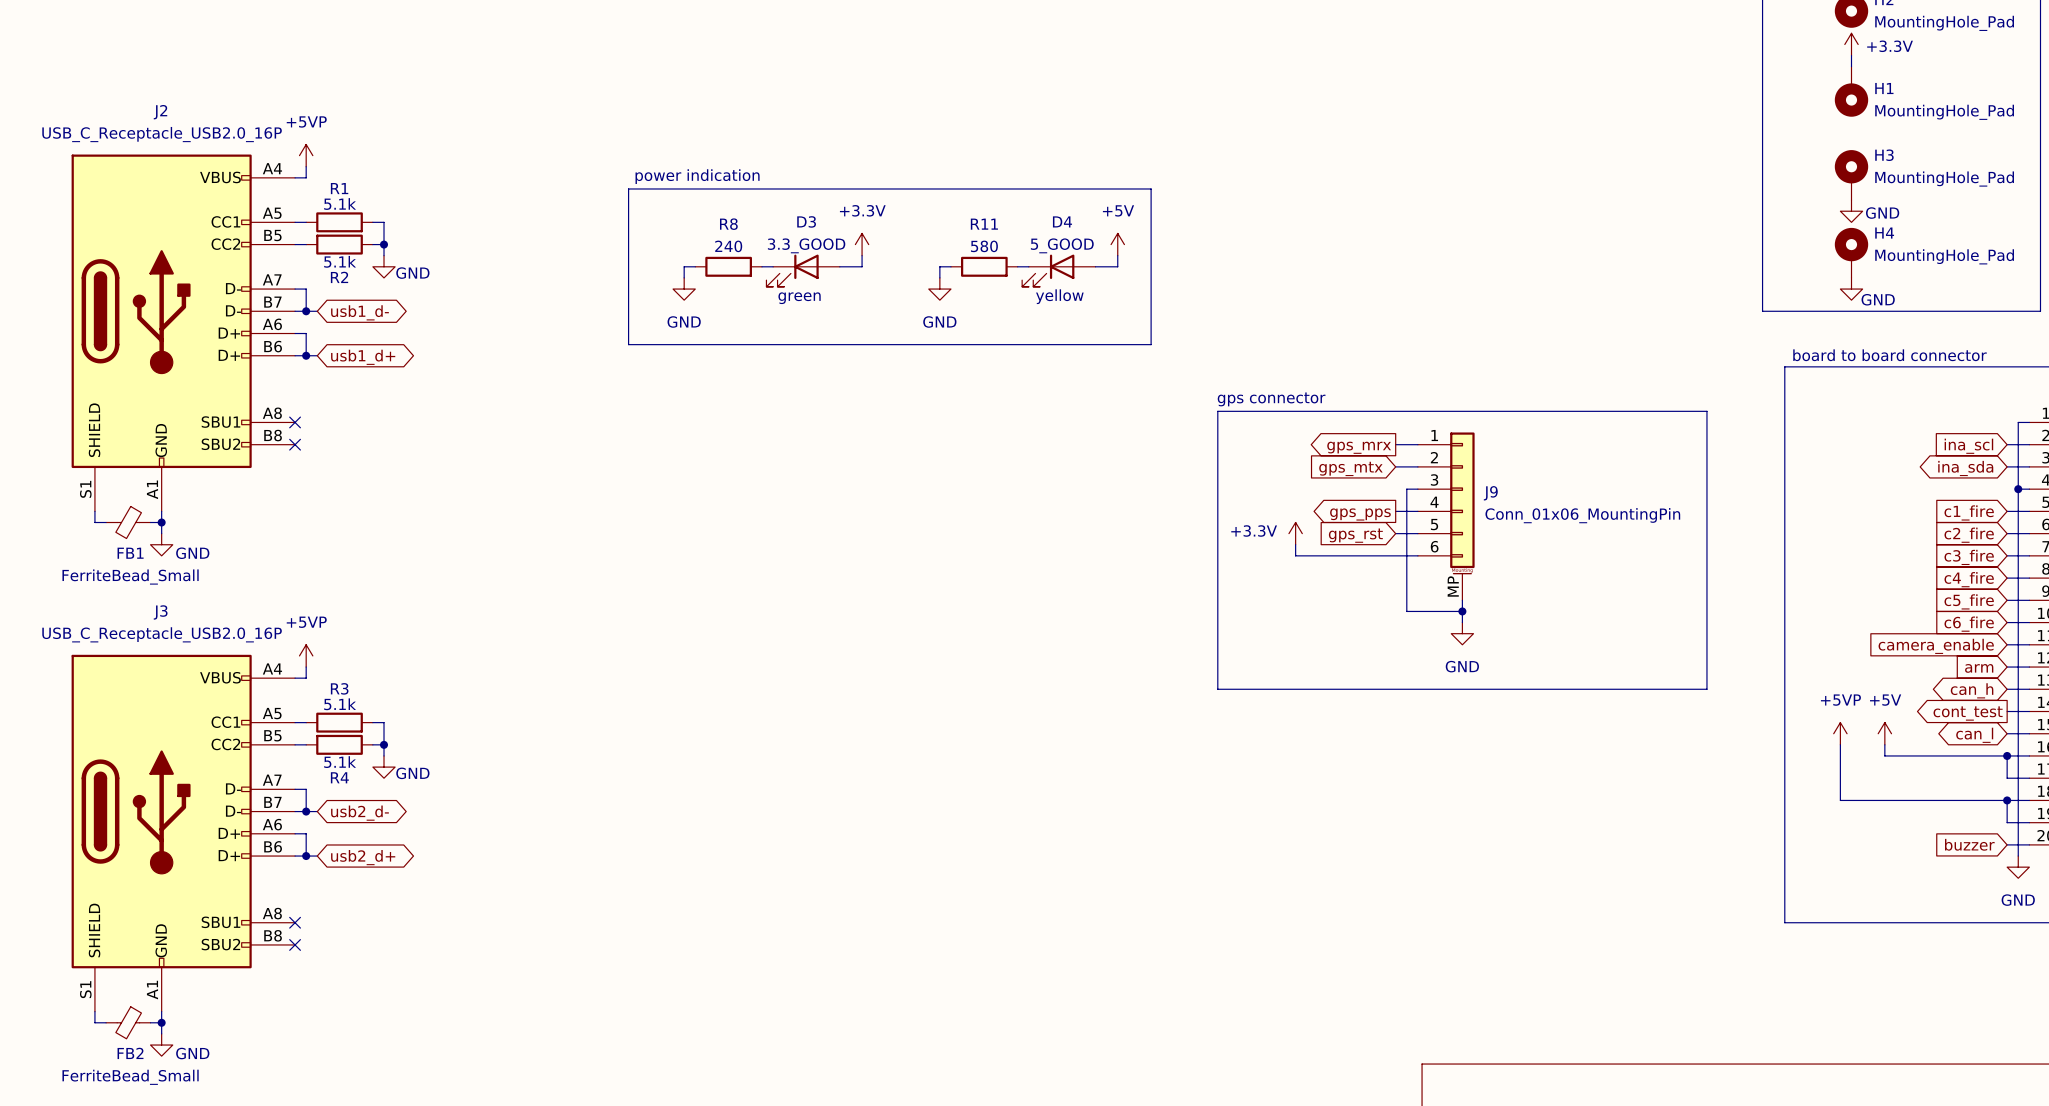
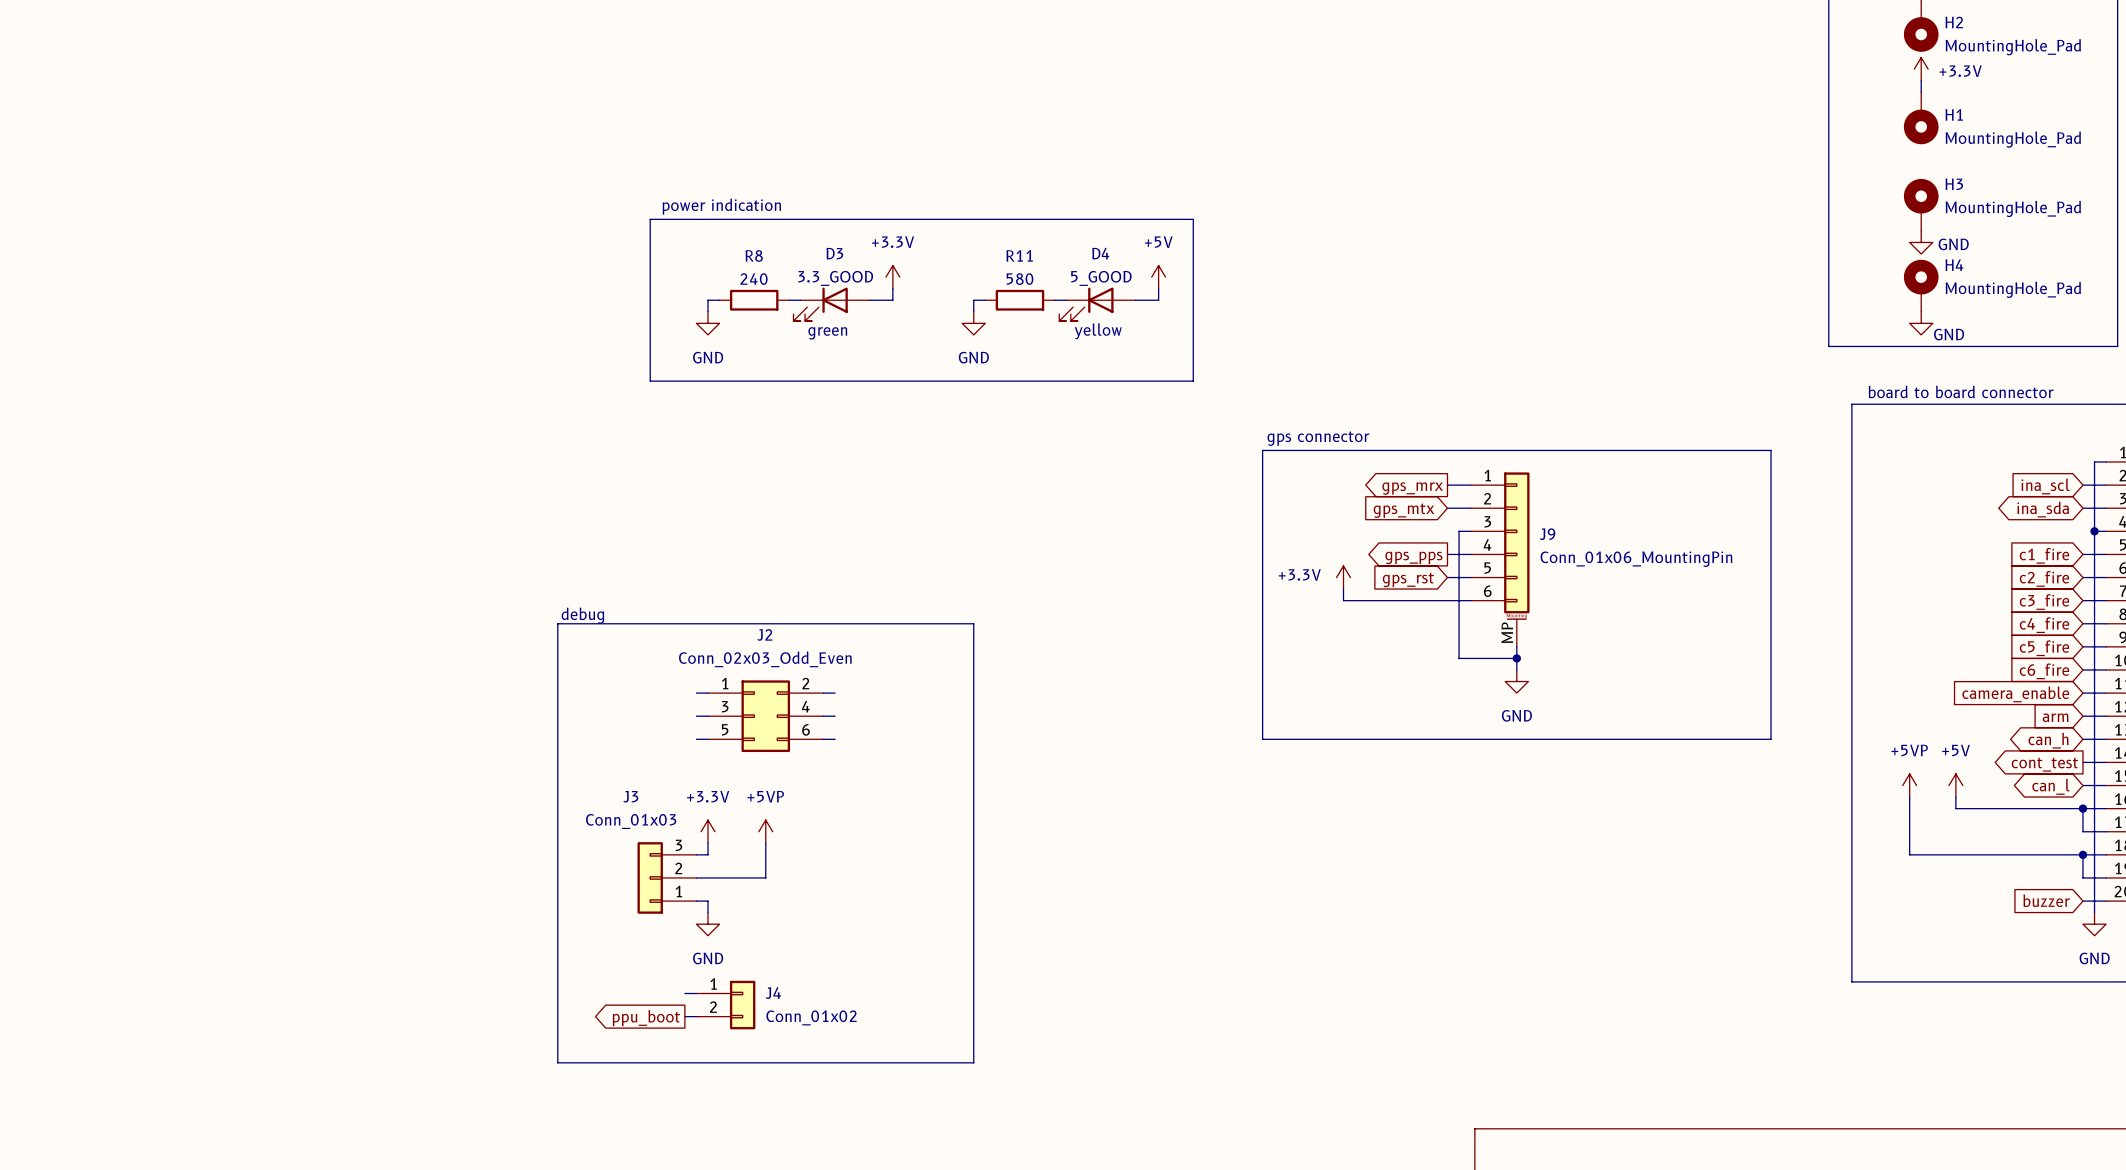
J2 name position: J2 (160, 112) -> J2 (764, 634)
J2 value: USB_C_Receptacle_USB2.0_16P (162, 134) -> Conn_02x03_Odd_Even (765, 659)
J2 symbol: [71, 154, 296, 512] -> [708, 680, 824, 753]
power symbol: +5VP (306, 155) -> none
wire: (306, 166) (306, 177) (295, 177) -> none
wire: (295, 222) (306, 222) -> none
R1: 5.1k (339, 222) -> none
wire: (372, 222) (384, 222) (384, 255) -> none
wire: (295, 244) (306, 244) -> none
R2: 5.1k (339, 244) -> none
wire: (372, 244) (384, 244) -> none
junction: (384, 244) -> none
power symbol: GND (384, 266) -> none
wire: (295, 289) (306, 289) (306, 311) -> none
wire: (295, 311) (317, 311) -> none
junction: (306, 311) -> none
global label: usb1_d- (359, 312) -> none
wire: (295, 333) (306, 333) (306, 355) -> none
wire: (295, 355) (317, 355) -> none
junction: (306, 355) -> none
global label: usb1_d+ (363, 357) -> none
no-connect mark: (295, 422) -> none
no-connect mark: (295, 444) -> none
wire: (94, 511) (94, 522) (106, 522) -> none
wire: (161, 511) (161, 533) -> none
FB1: FerriteBead_Small (128, 522) -> none
wire: (150, 522) (161, 522) -> none
junction: (161, 522) -> none
power symbol: GND (161, 544) -> none
text: none -> debug (582, 615)
line: none -> (557, 623) (973, 623) (973, 1062) (557, 1062) (557, 623)
J3 name position: J3 (160, 612) -> J3 (630, 796)
J3 value: USB_C_Receptacle_USB2.0_16P (162, 634) -> Conn_01x03 (631, 821)
wire: none -> (696, 693) (708, 693)
wire: none -> (823, 693) (835, 693)
J3 symbol: [71, 654, 296, 1012] -> [637, 842, 697, 914]
power symbol: +5VP (306, 655) -> none
wire: (306, 667) (306, 678) (295, 678) -> none
wire: none -> (696, 716) (708, 716)
wire: none -> (823, 716) (835, 716)
wire: none -> (696, 739) (708, 739)
wire: none -> (823, 739) (835, 739)
wire: (295, 722) (306, 722) -> none
R3: 5.1k (339, 722) -> none
wire: (372, 722) (384, 722) (384, 755) -> none
wire: (295, 744) (306, 744) -> none
R4: 5.1k (339, 744) -> none
wire: (372, 744) (384, 744) -> none
junction: (384, 744) -> none
power symbol: GND (384, 767) -> none
power symbol: none -> +3.3V (708, 831)
power symbol: none -> +5VP (765, 831)
wire: (295, 789) (306, 789) (306, 811) -> none
wire: none -> (708, 843) (708, 854) (696, 854)
wire: none -> (765, 843) (765, 877) (696, 877)
wire: (295, 811) (317, 811) -> none
junction: (306, 811) -> none
global label: usb2_d- (359, 813) -> none
wire: (295, 833) (306, 833) (306, 856) -> none
wire: none -> (696, 901) (708, 901) (708, 912)
wire: (295, 856) (317, 856) -> none
junction: (306, 856) -> none
global label: usb2_d+ (363, 857) -> none
power symbol: none -> GND (708, 924)
no-connect mark: (295, 922) -> none
wire: none -> (684, 993) (696, 993)
no-connect mark: (295, 944) -> none
J4: none -> Conn_01x02 (725, 1005)
wire: none -> (684, 1016) (696, 1016)
global label: none -> ppu_boot (646, 1018)
wire: (94, 1011) (94, 1022) (106, 1022) -> none
wire: (161, 1011) (161, 1033) -> none
FB2: FerriteBead_Small (128, 1022) -> none
wire: (150, 1022) (161, 1022) -> none
junction: (161, 1022) -> none
power symbol: GND (161, 1045) -> none

